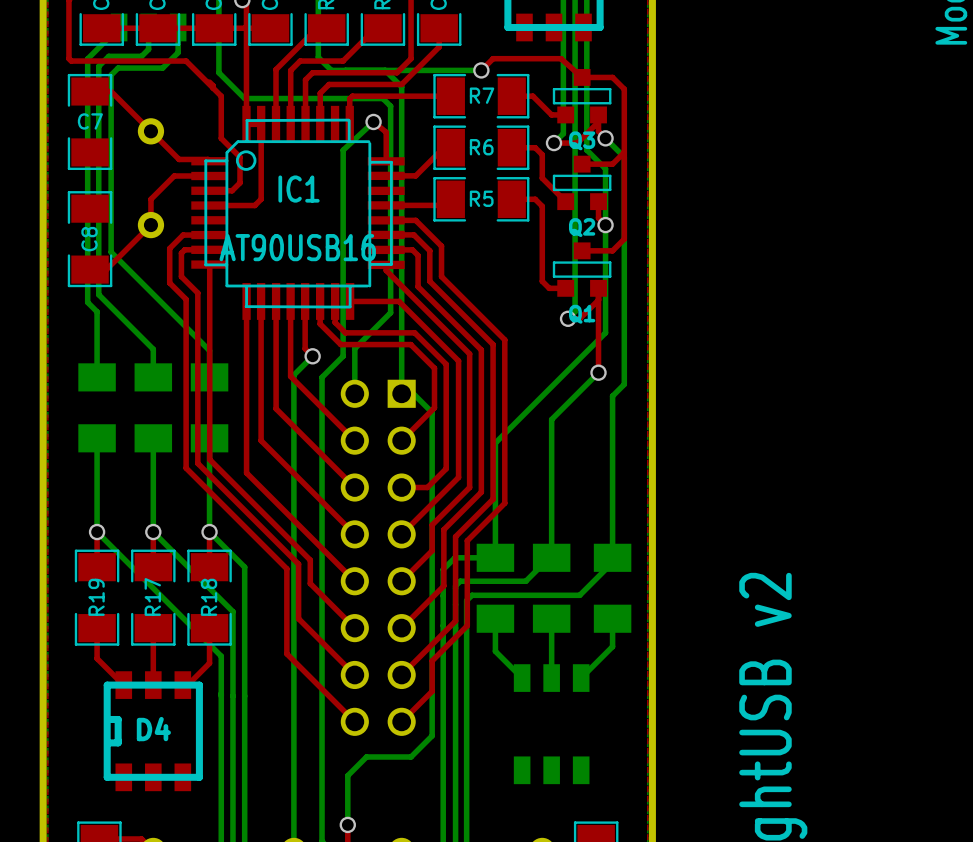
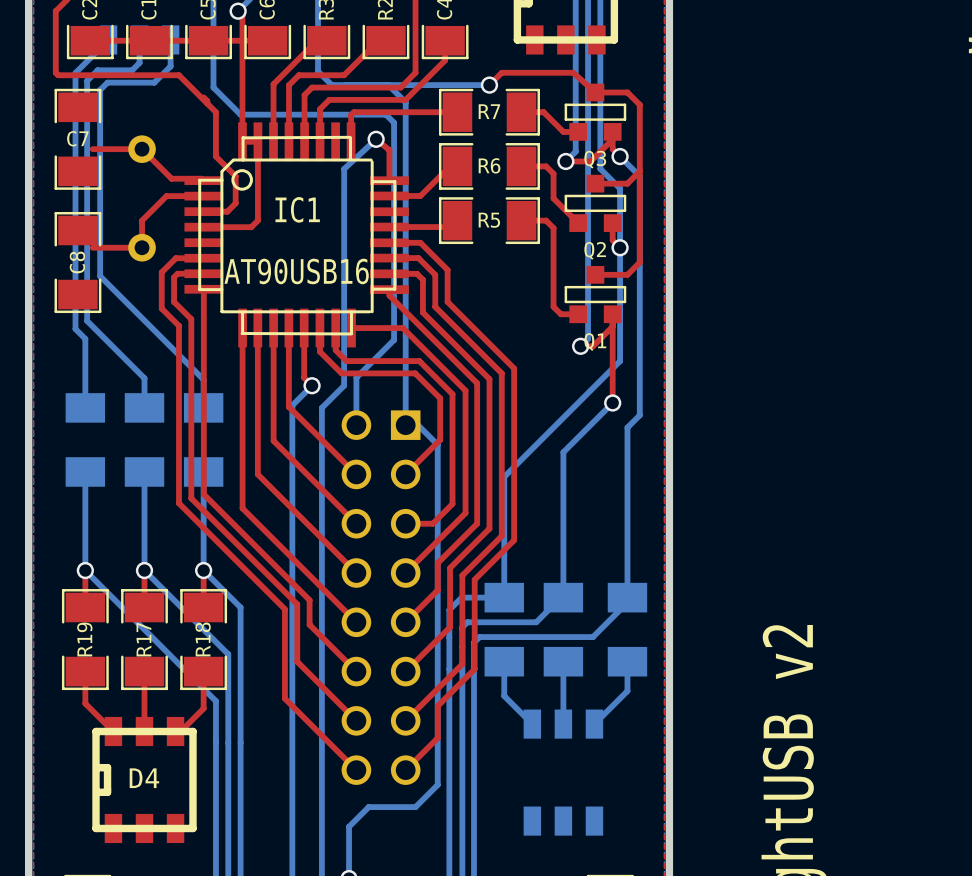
top track: (90, 91) (111, 91) (150, 131) -> (92, 149) (142, 149)
top track: (150, 225) (106, 269) (90, 269) -> (142, 247) (92, 247)

